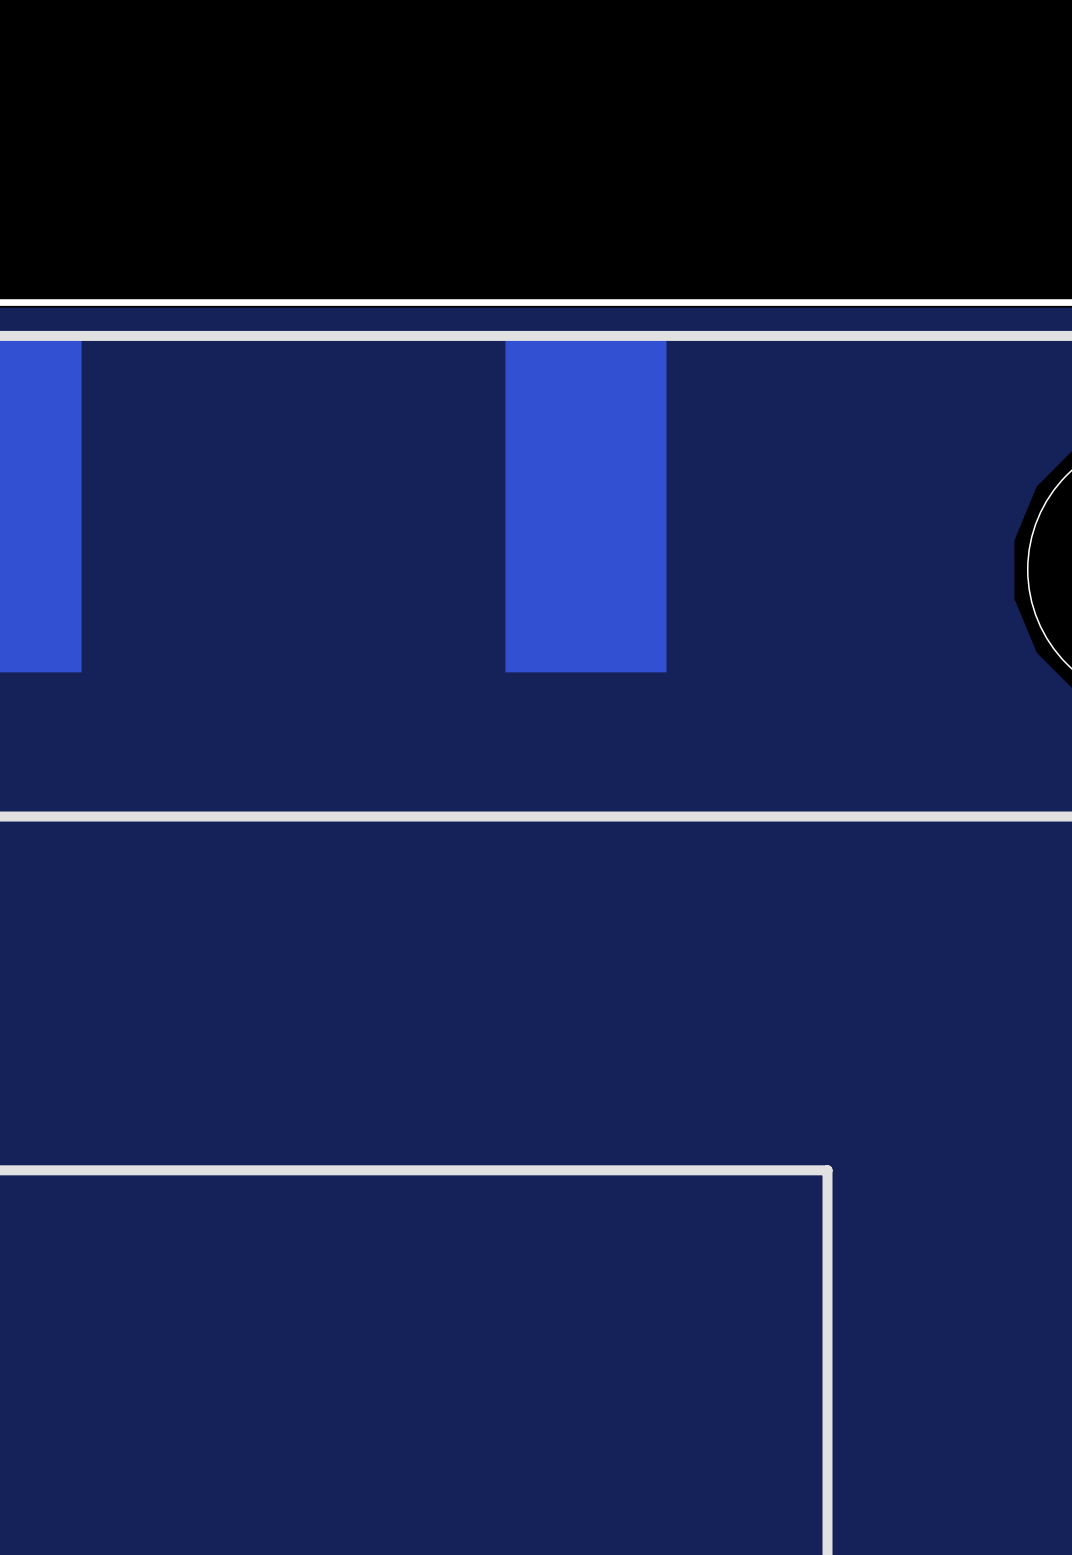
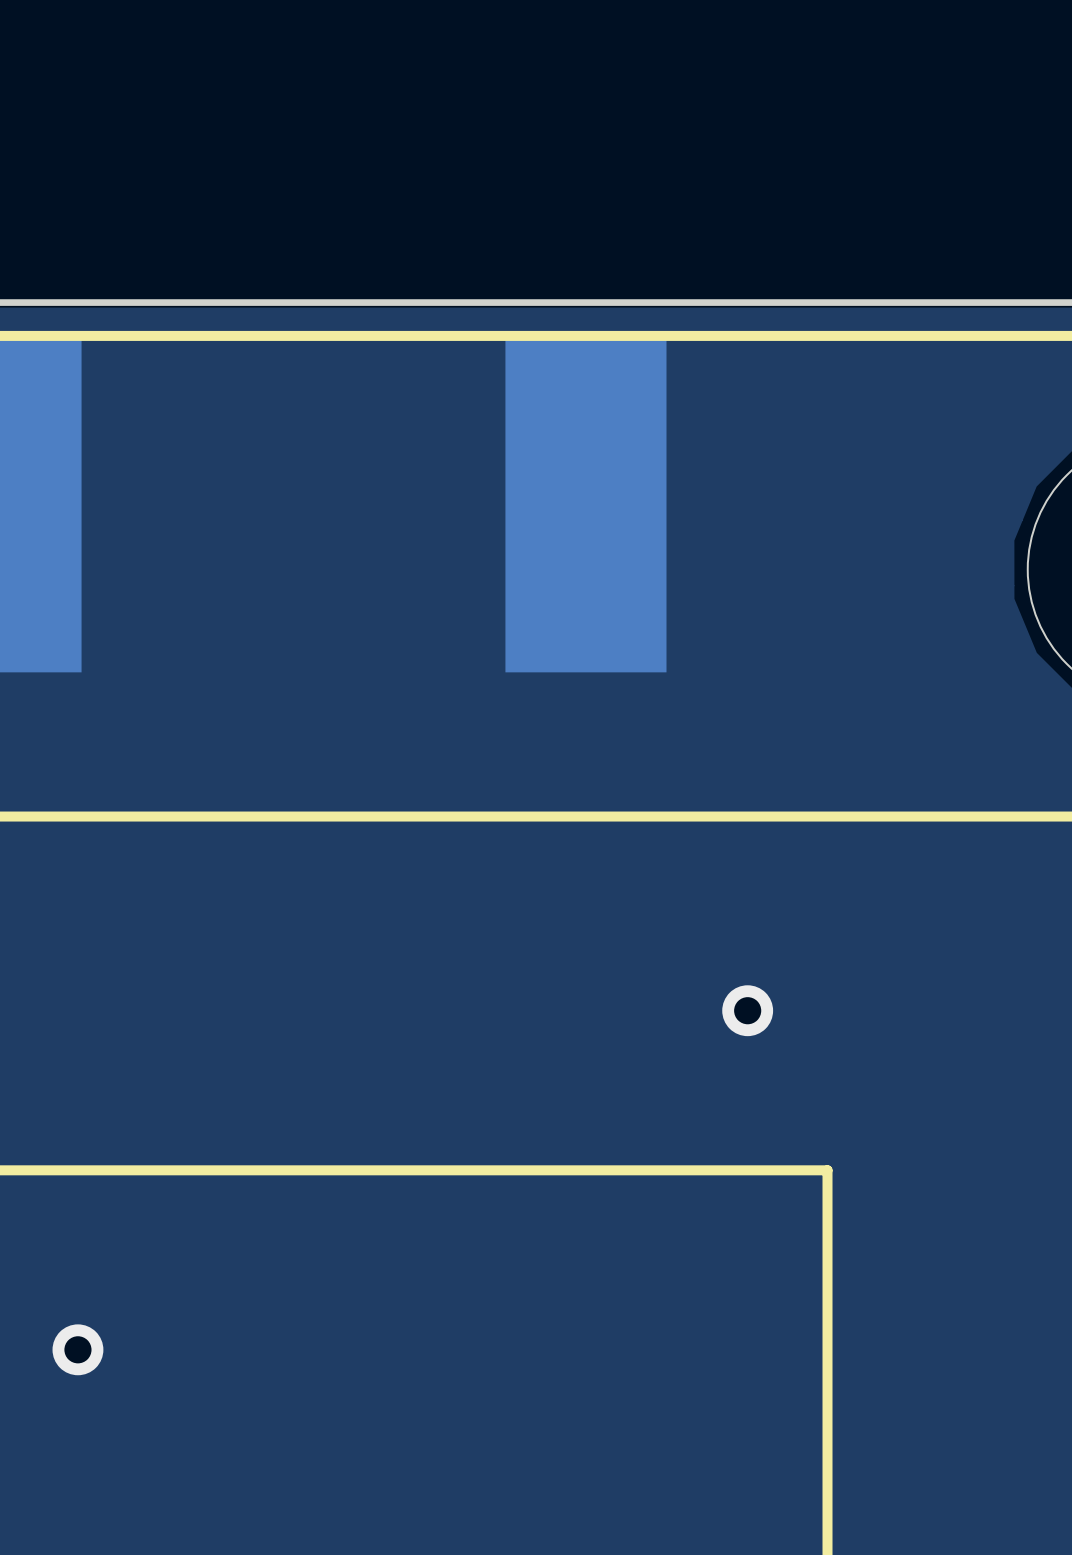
via: none -> (747, 1010)
via: none -> (77, 1349)

